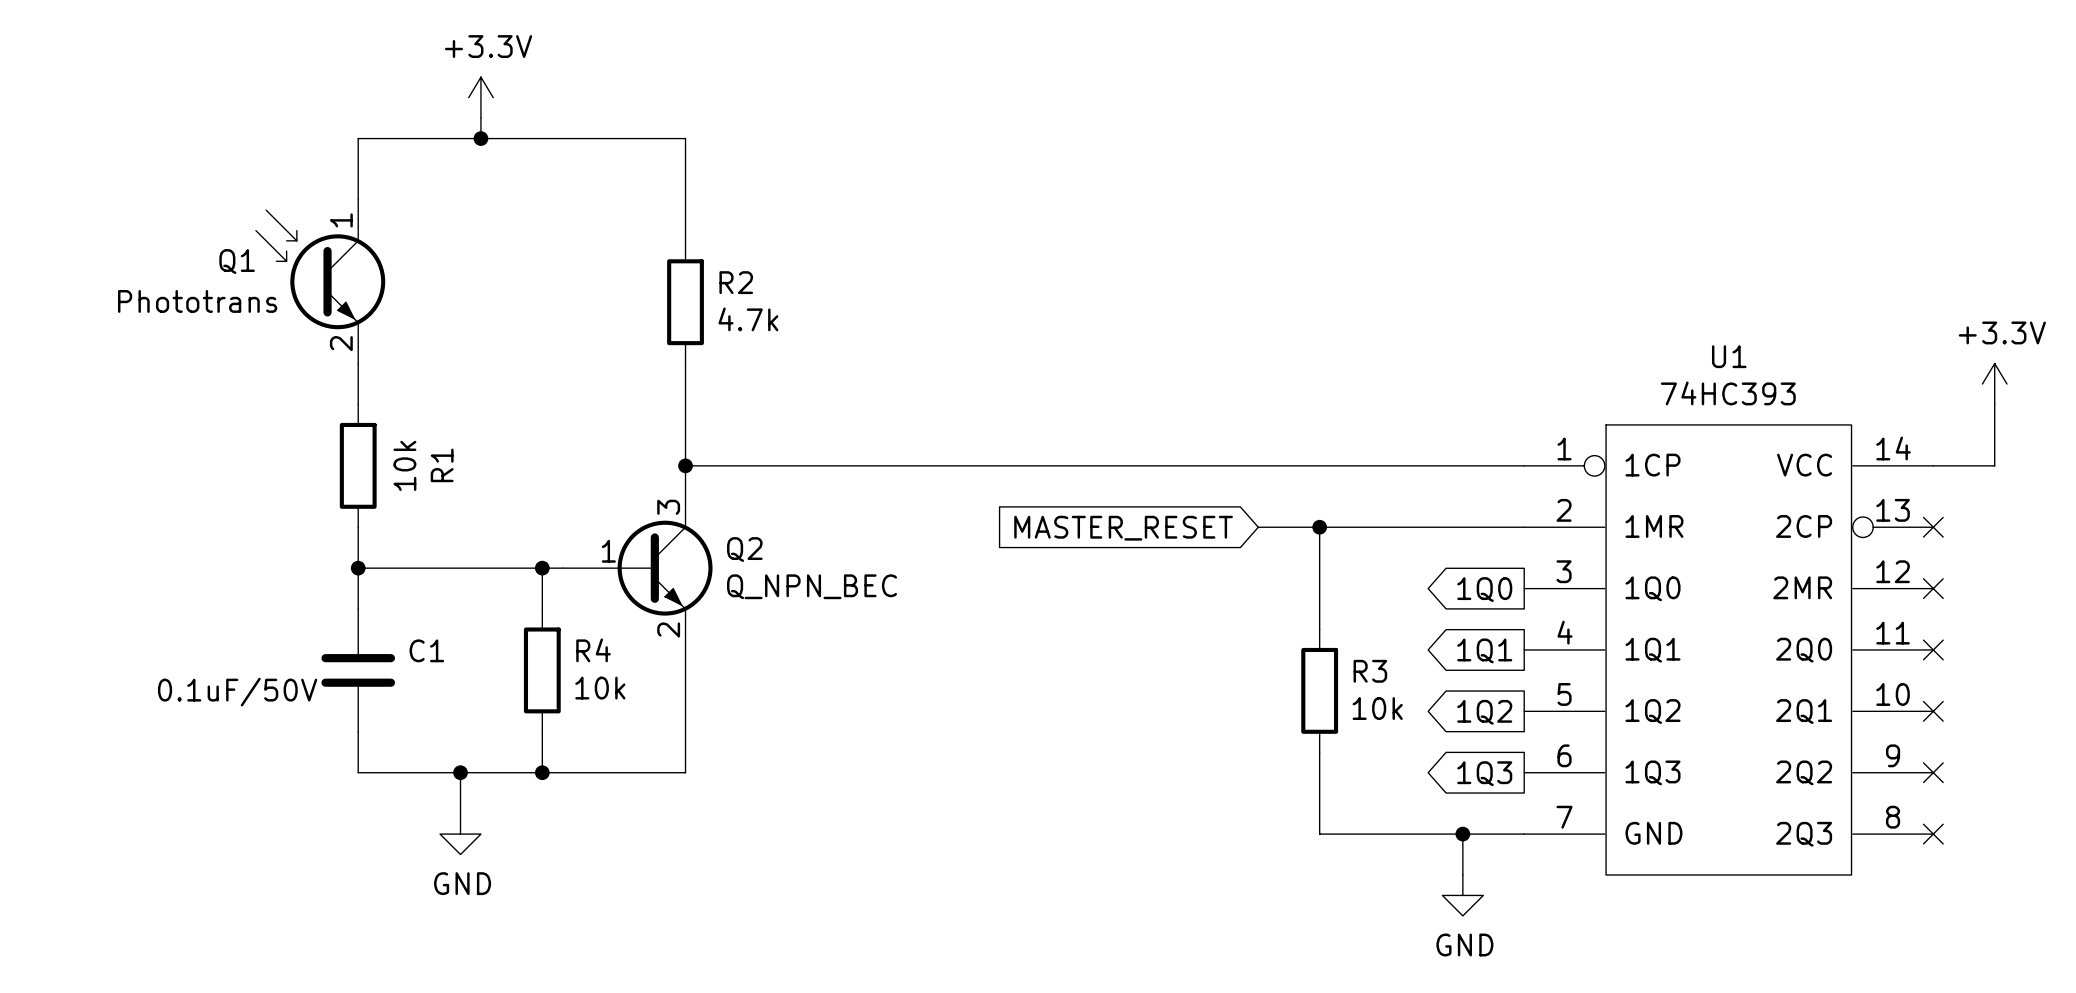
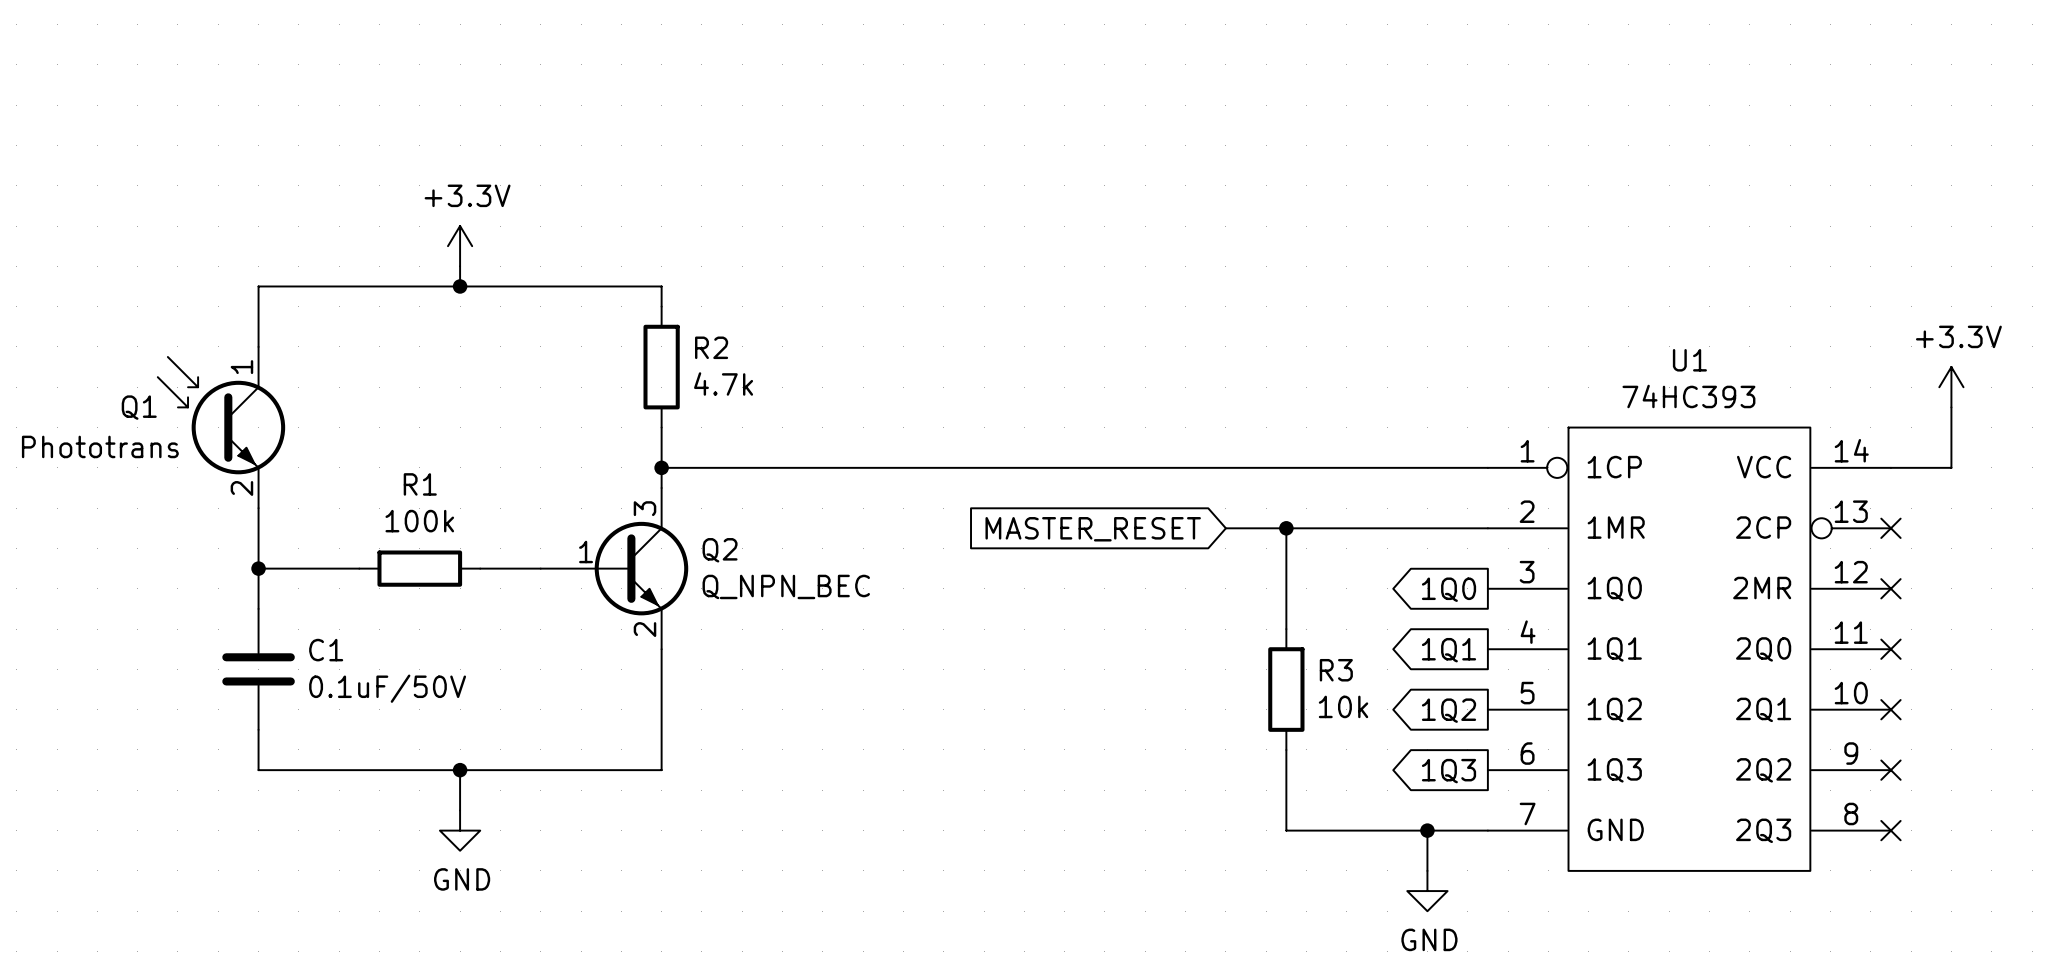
power symbol position: +3.3V (480, 97) -> +3.3V (460, 246)
wire: (480, 118) (480, 138) -> (460, 266) (460, 286)
junction: (480, 138) -> none
wire: (358, 199) (358, 138) (685, 138) (685, 240) -> none
Q1 position: (320, 281) -> (221, 427)
junction: none -> (460, 286)
wire: none -> (661, 306) (661, 286) (258, 286) (258, 346)
R2 position: (685, 302) -> (661, 367)
wire: (358, 363) (358, 404) -> none
wire: (685, 363) (685, 424) -> none
R1 rotation: 0° (358, 465) -> 90° clockwise (419, 568)
R1 position: (358, 465) -> (419, 568)
R1 value: 10k (404, 465) -> 100k (419, 521)
R1 name position: R1 (442, 465) -> R1 (420, 484)
wire: none -> (258, 508) (258, 608)
wire: (358, 527) (358, 609) -> none
wire: none -> (258, 568) (339, 568)
junction position: (358, 568) -> (258, 568)
wire: (378, 568) (501, 568) -> none
wire: (542, 568) (542, 609) -> none
junction: (542, 568) -> none
C1 position: (358, 670) -> (258, 669)
R4: 10k (542, 670) -> none
C1 value position: 0.1uF/50V (237, 692) -> 0.1uF/50V (387, 688)
wire: (358, 731) (358, 772) -> (258, 729) (258, 770) (339, 770)
wire: (542, 731) (542, 772) -> none
wire: (460, 772) (460, 813) -> (460, 770) (460, 810)
junction position: (460, 772) -> (460, 770)
junction: (542, 772) -> none
power symbol position: GND (460, 834) -> GND (460, 830)

